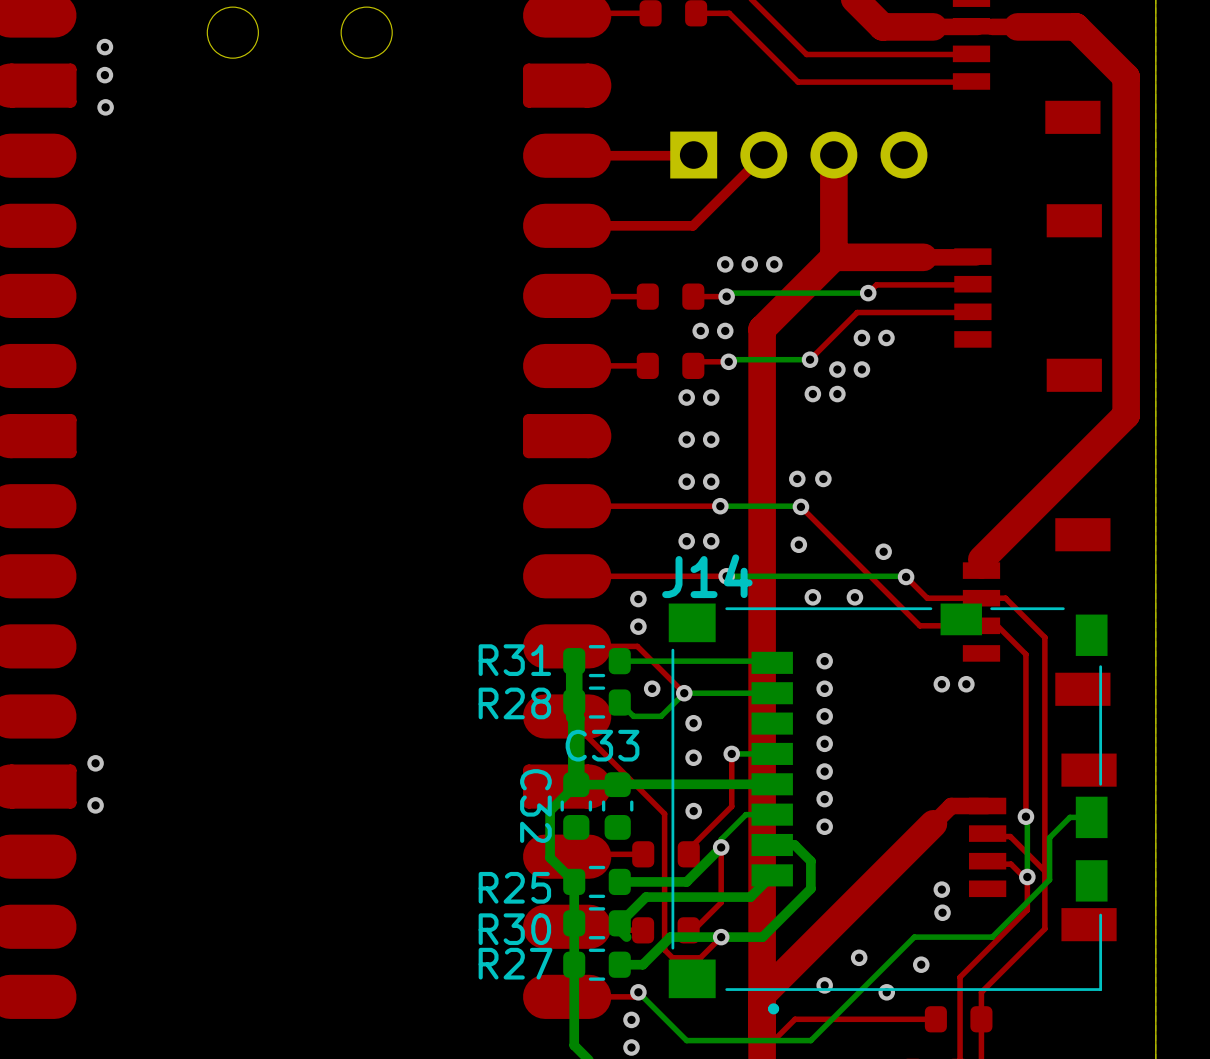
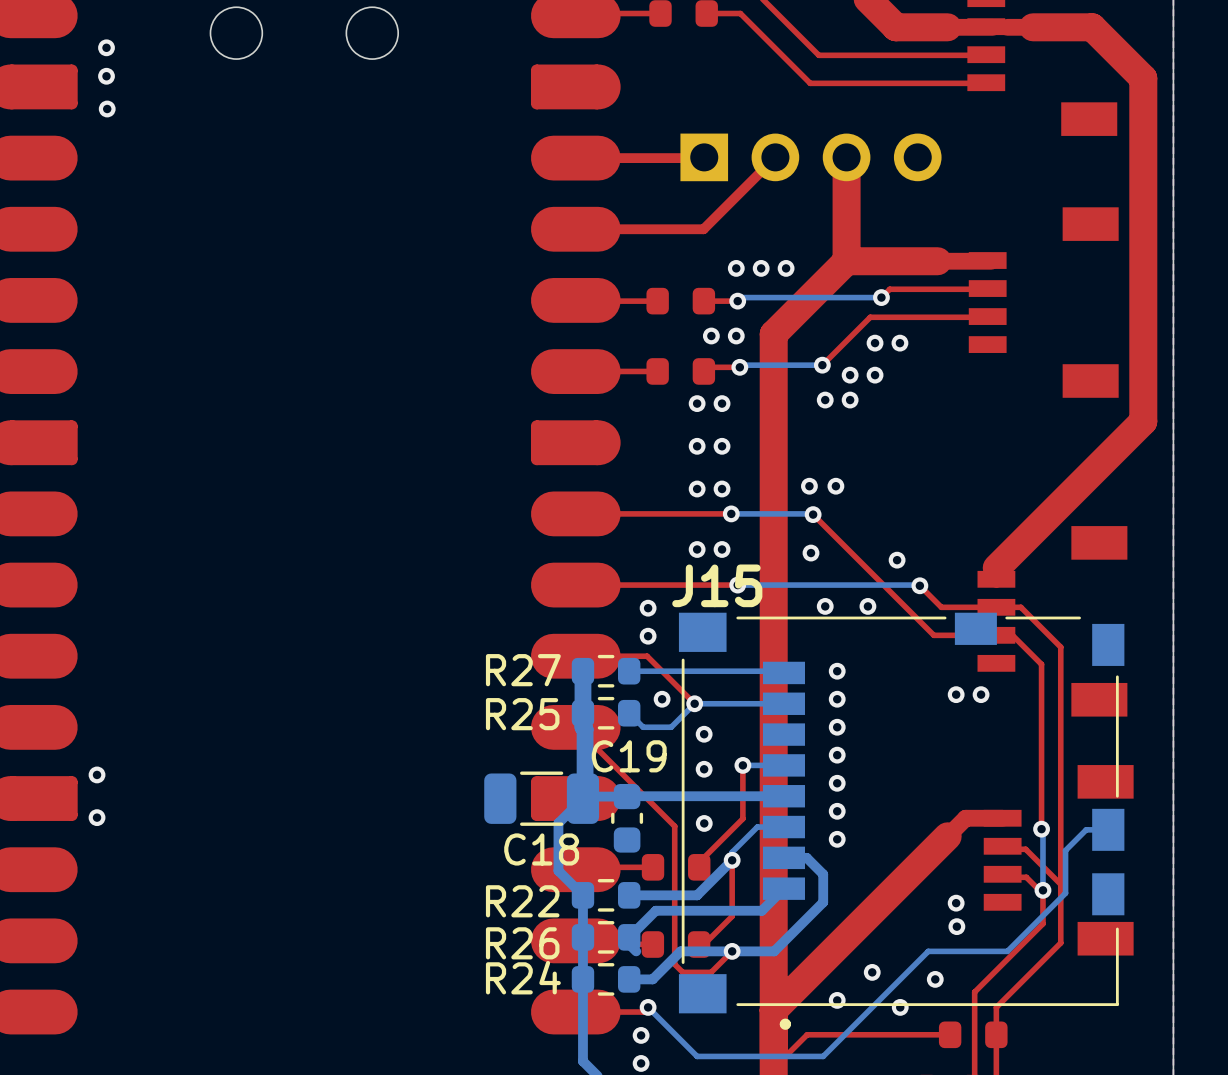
J14 name: J14 (707, 576) -> J15 (717, 585)
R31 name: R31 (514, 660) -> R27 (523, 670)
R28 name: R28 (514, 703) -> R25 (522, 714)
C33 name: C33 (602, 745) -> C19 (629, 756)
C18: none -> (541, 798)
C32: (576, 806) -> none
R25 name: R25 (514, 887) -> R22 (522, 901)
R30 name: R30 (514, 929) -> R26 (522, 943)
R27 name: R27 (515, 963) -> R24 (523, 977)

